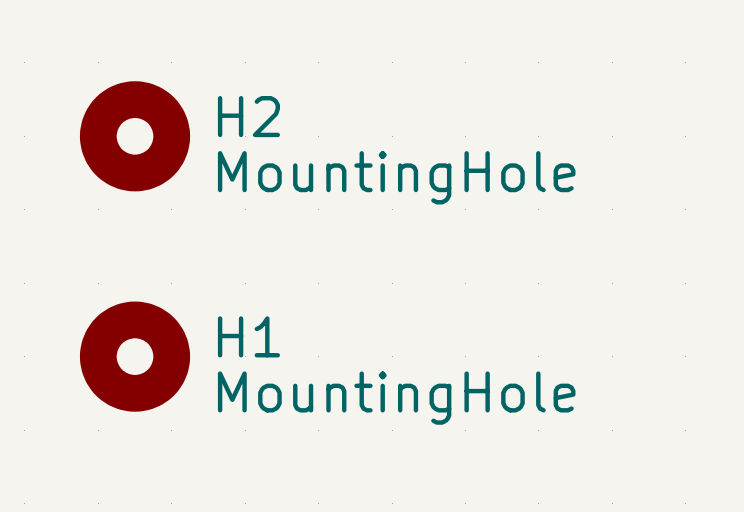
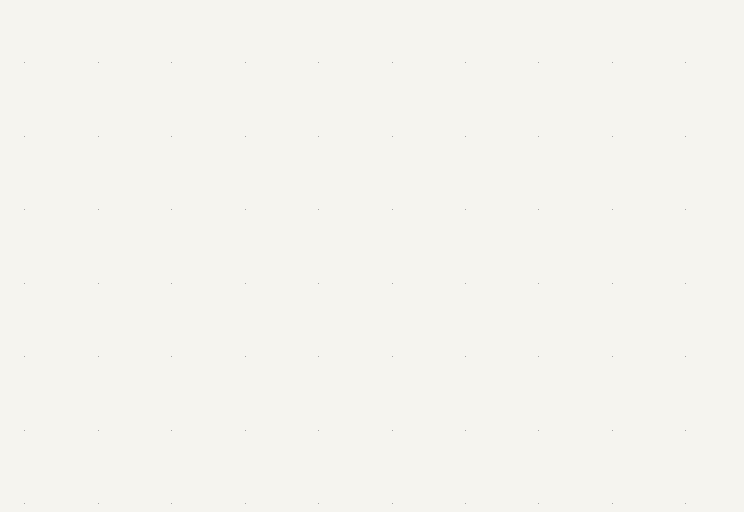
H2: MountingHole (135, 136) -> none
H1: MountingHole (135, 356) -> none

